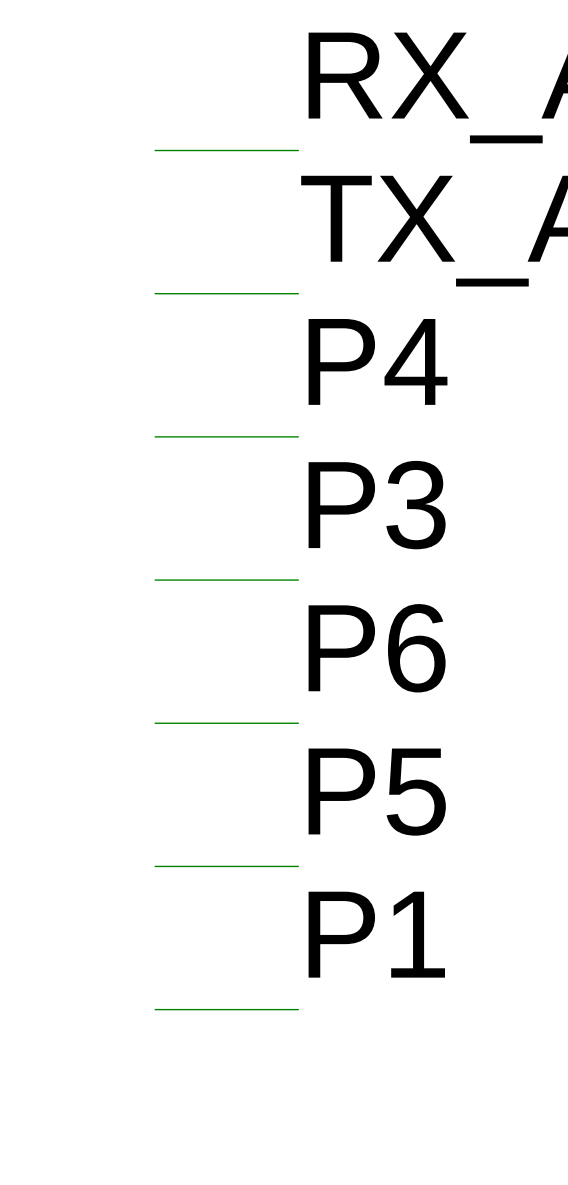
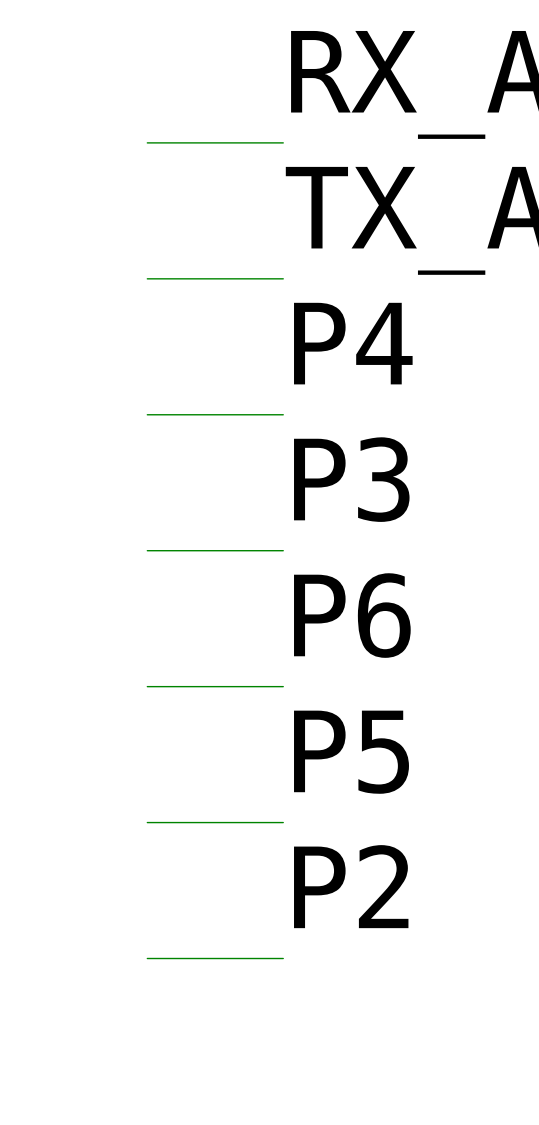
label: P1 (376, 934) -> P2 (351, 886)

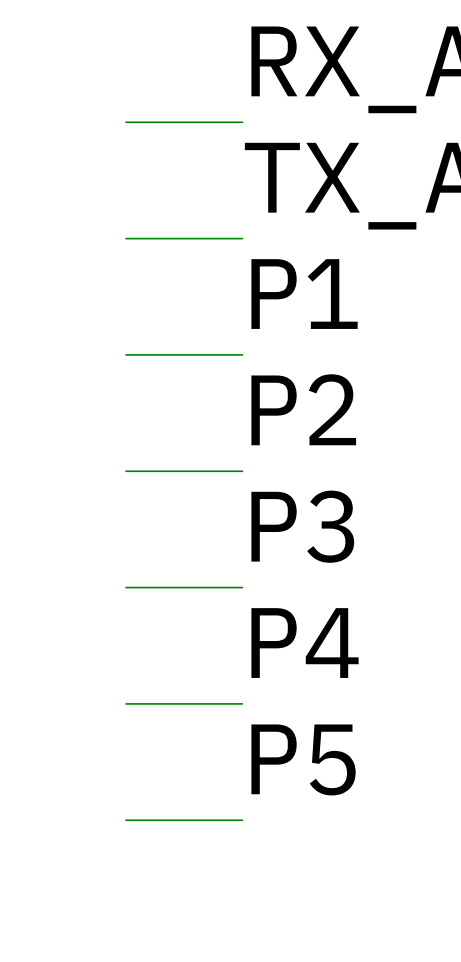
label: P4 (353, 343) -> P1 (304, 294)
label: P3 (351, 479) -> P2 (303, 409)
label: P6 (352, 615) -> P3 (302, 526)
label: P5 (351, 752) -> P4 (304, 643)
label: P2 (351, 886) -> P5 (303, 759)

